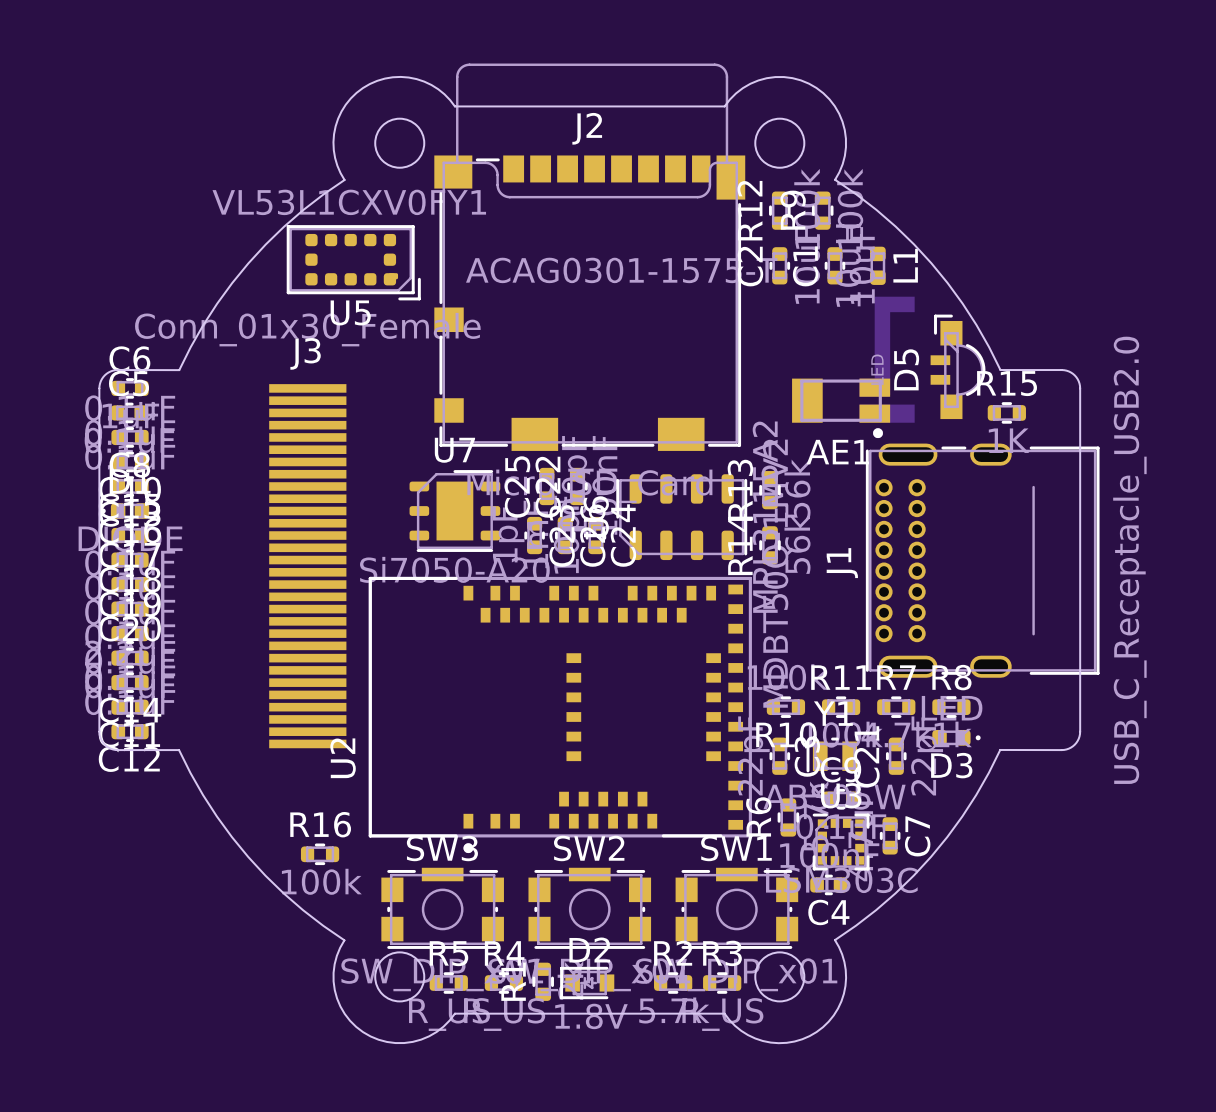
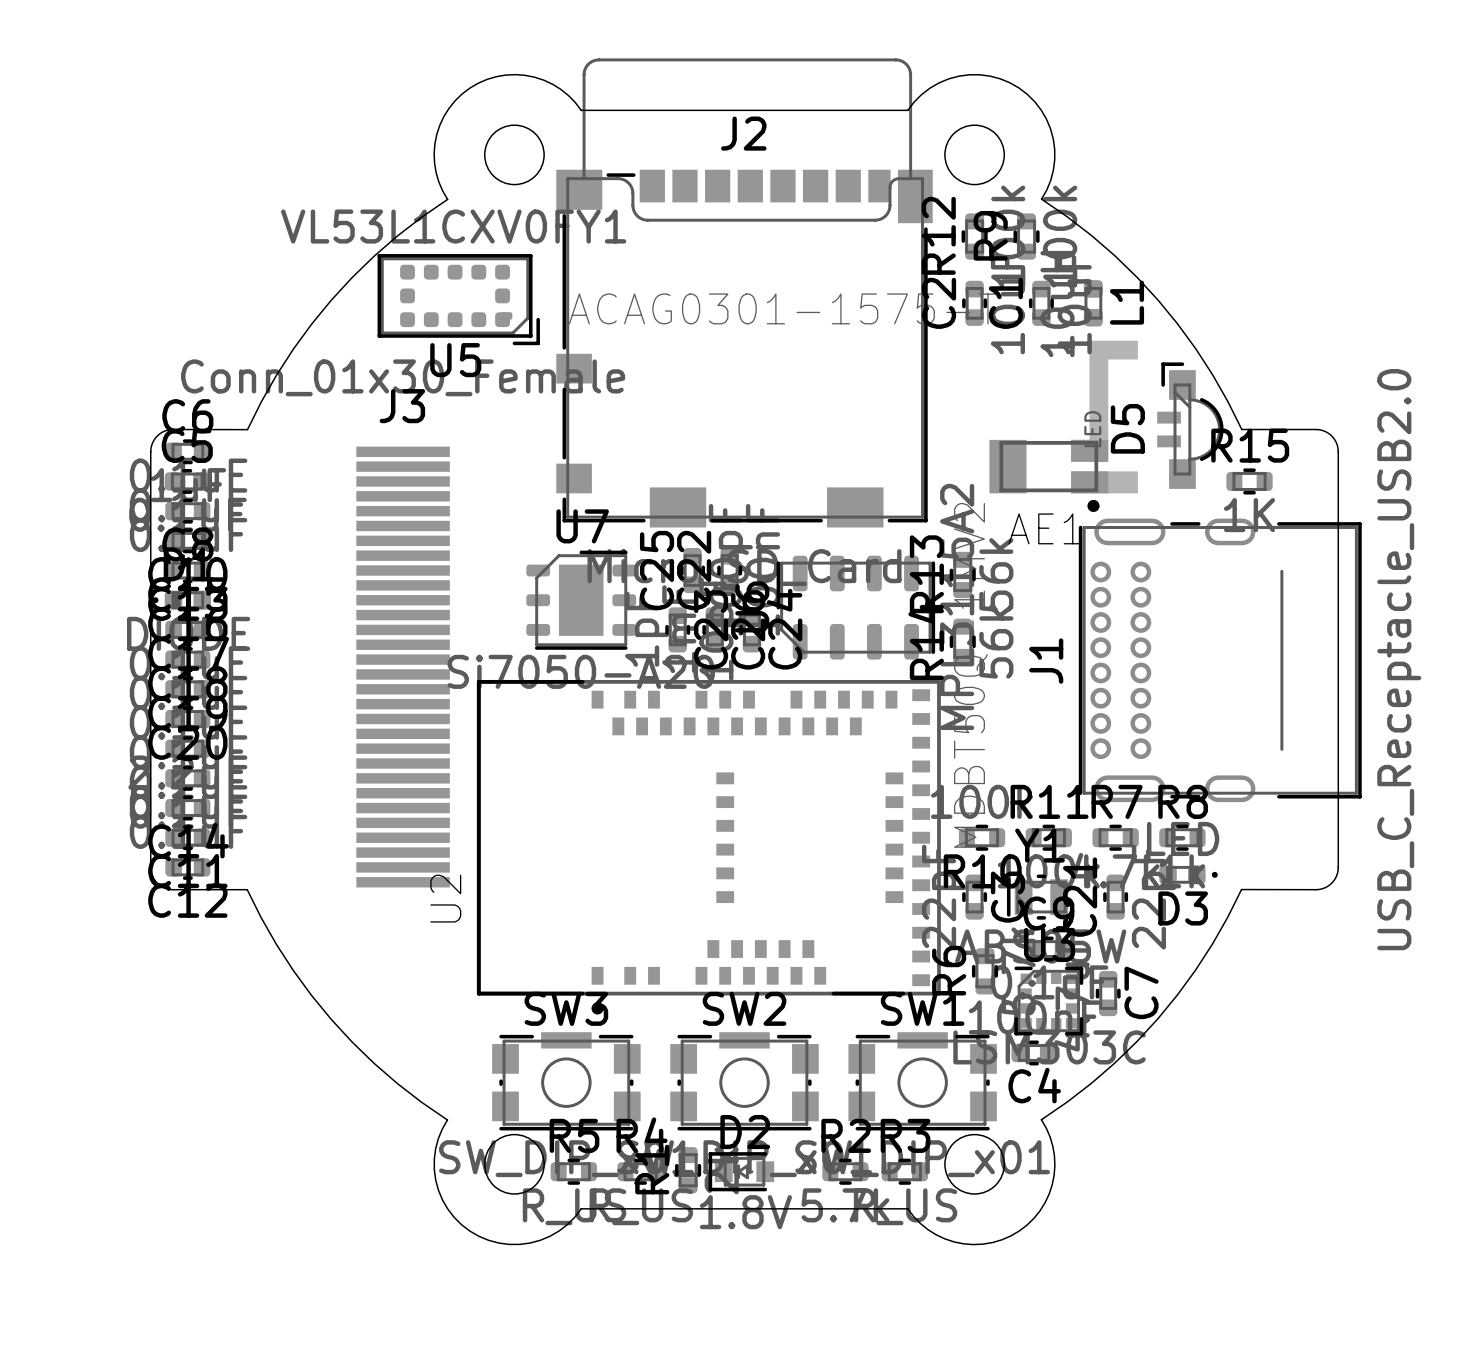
R16: 100k (320, 854) -> none

